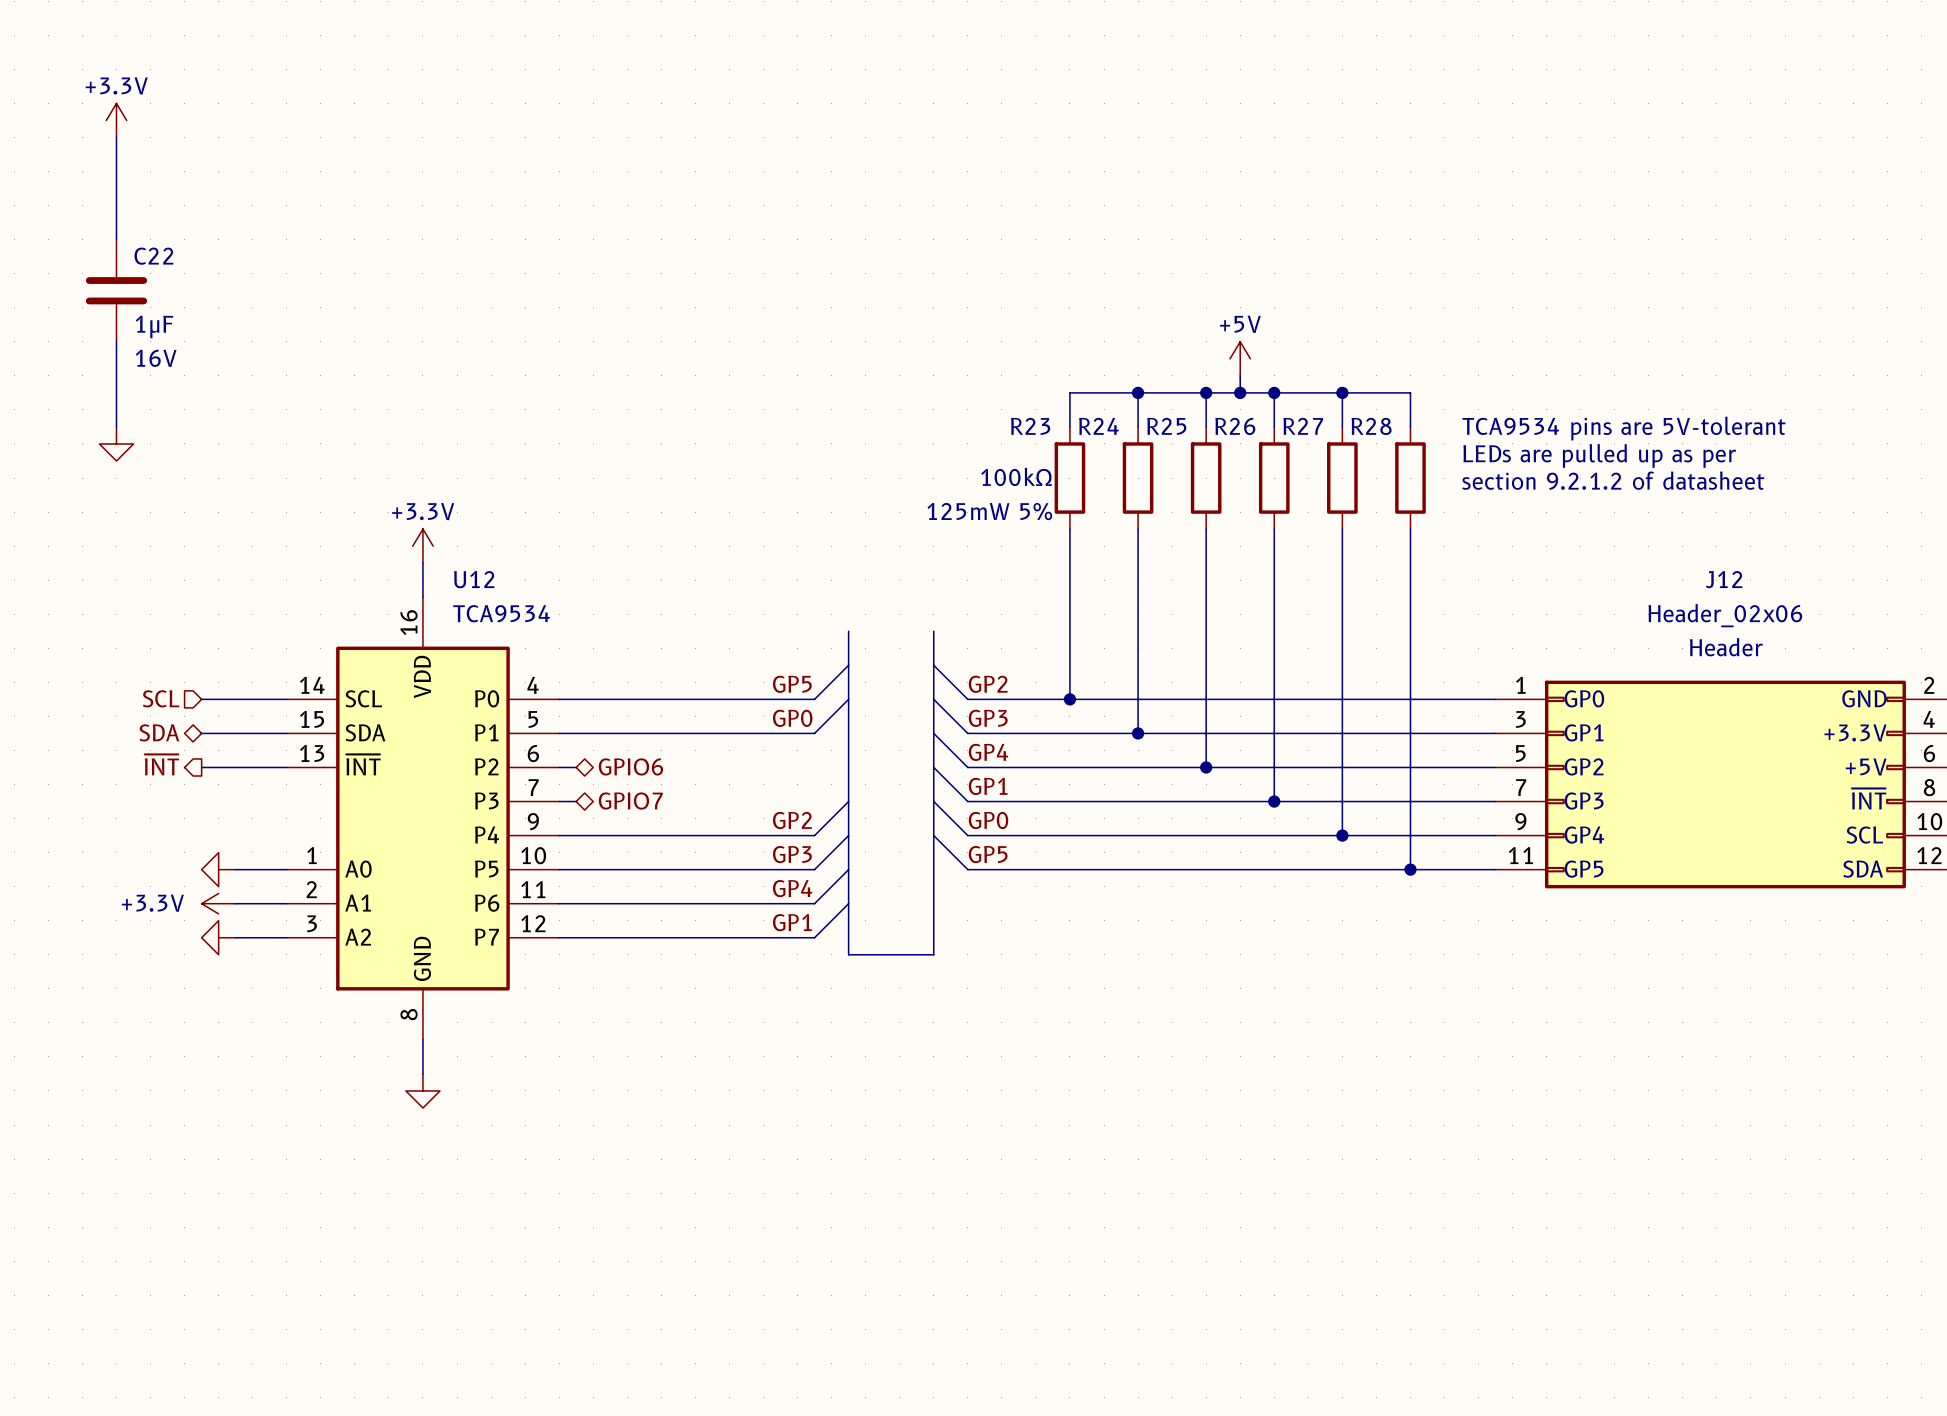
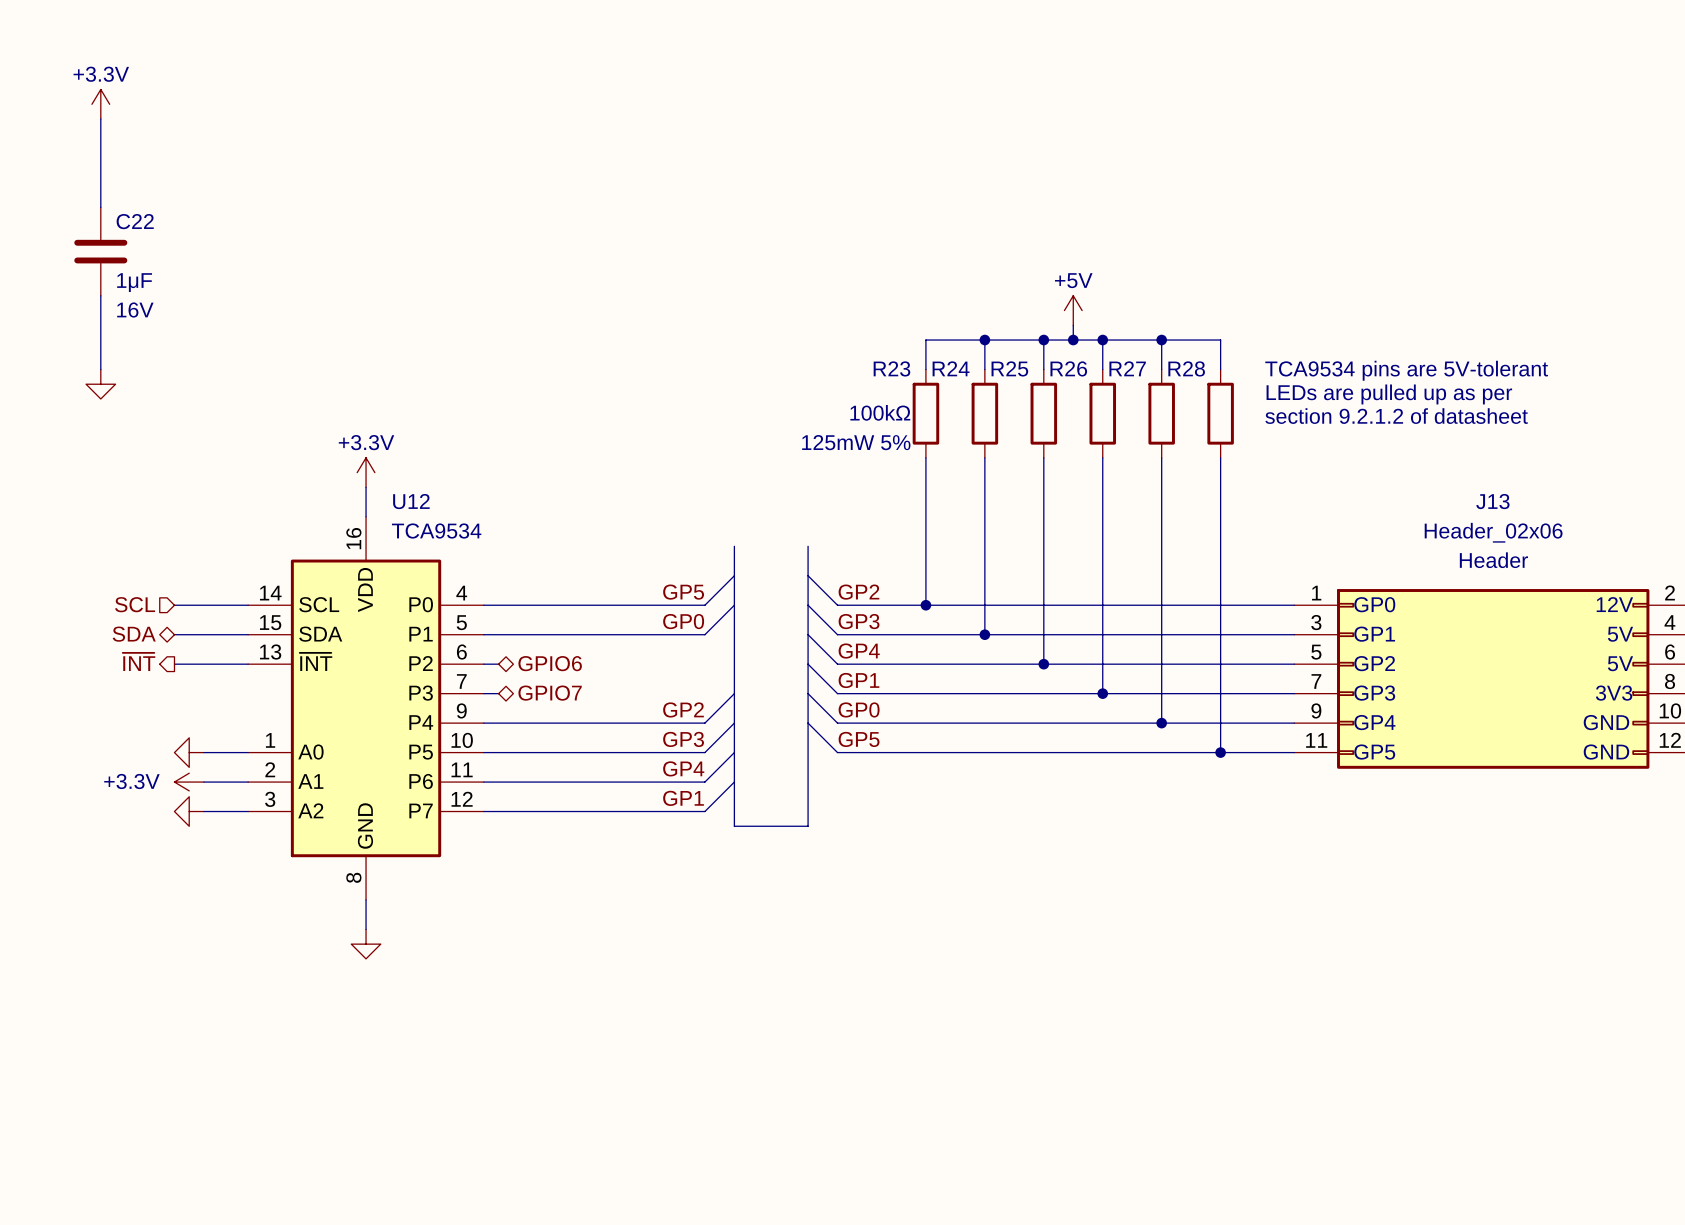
J12 name: J12 (1724, 579) -> J13 (1492, 501)
J12 text: GND (1864, 698) -> 12V (1614, 604)
J12 text: +3.3V (1855, 732) -> 5V (1620, 634)
J12 text: +5V (1866, 766) -> 5V (1620, 663)
J12 text: ~{INT} (1869, 798) -> 3V3 (1614, 693)
J12 text: SCL (1864, 835) -> GND (1606, 722)
J12 text: SDA (1863, 869) -> GND (1606, 752)

